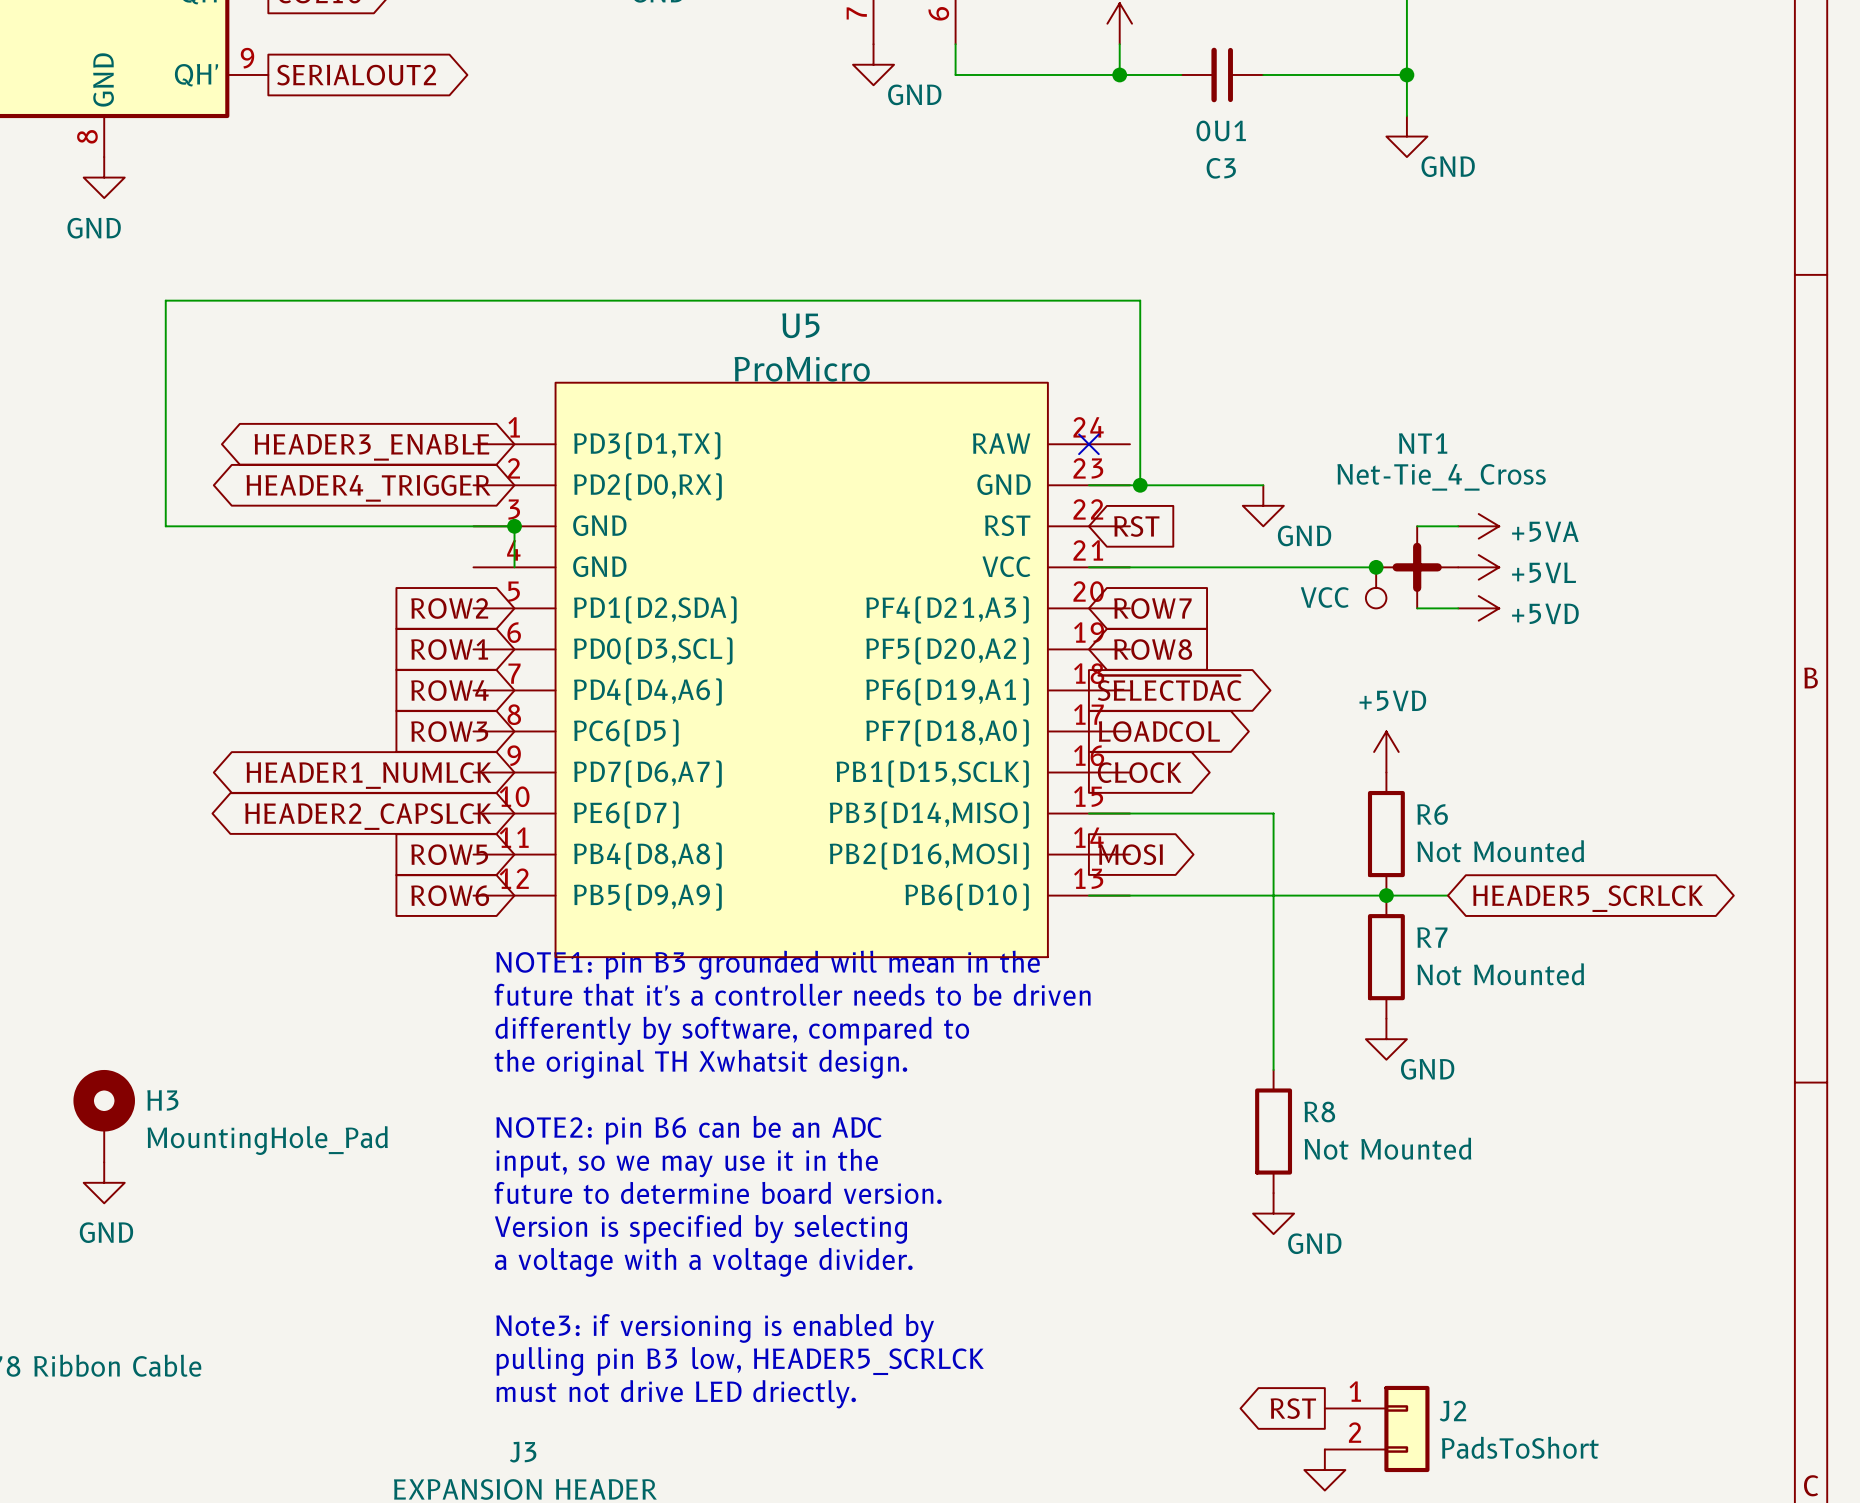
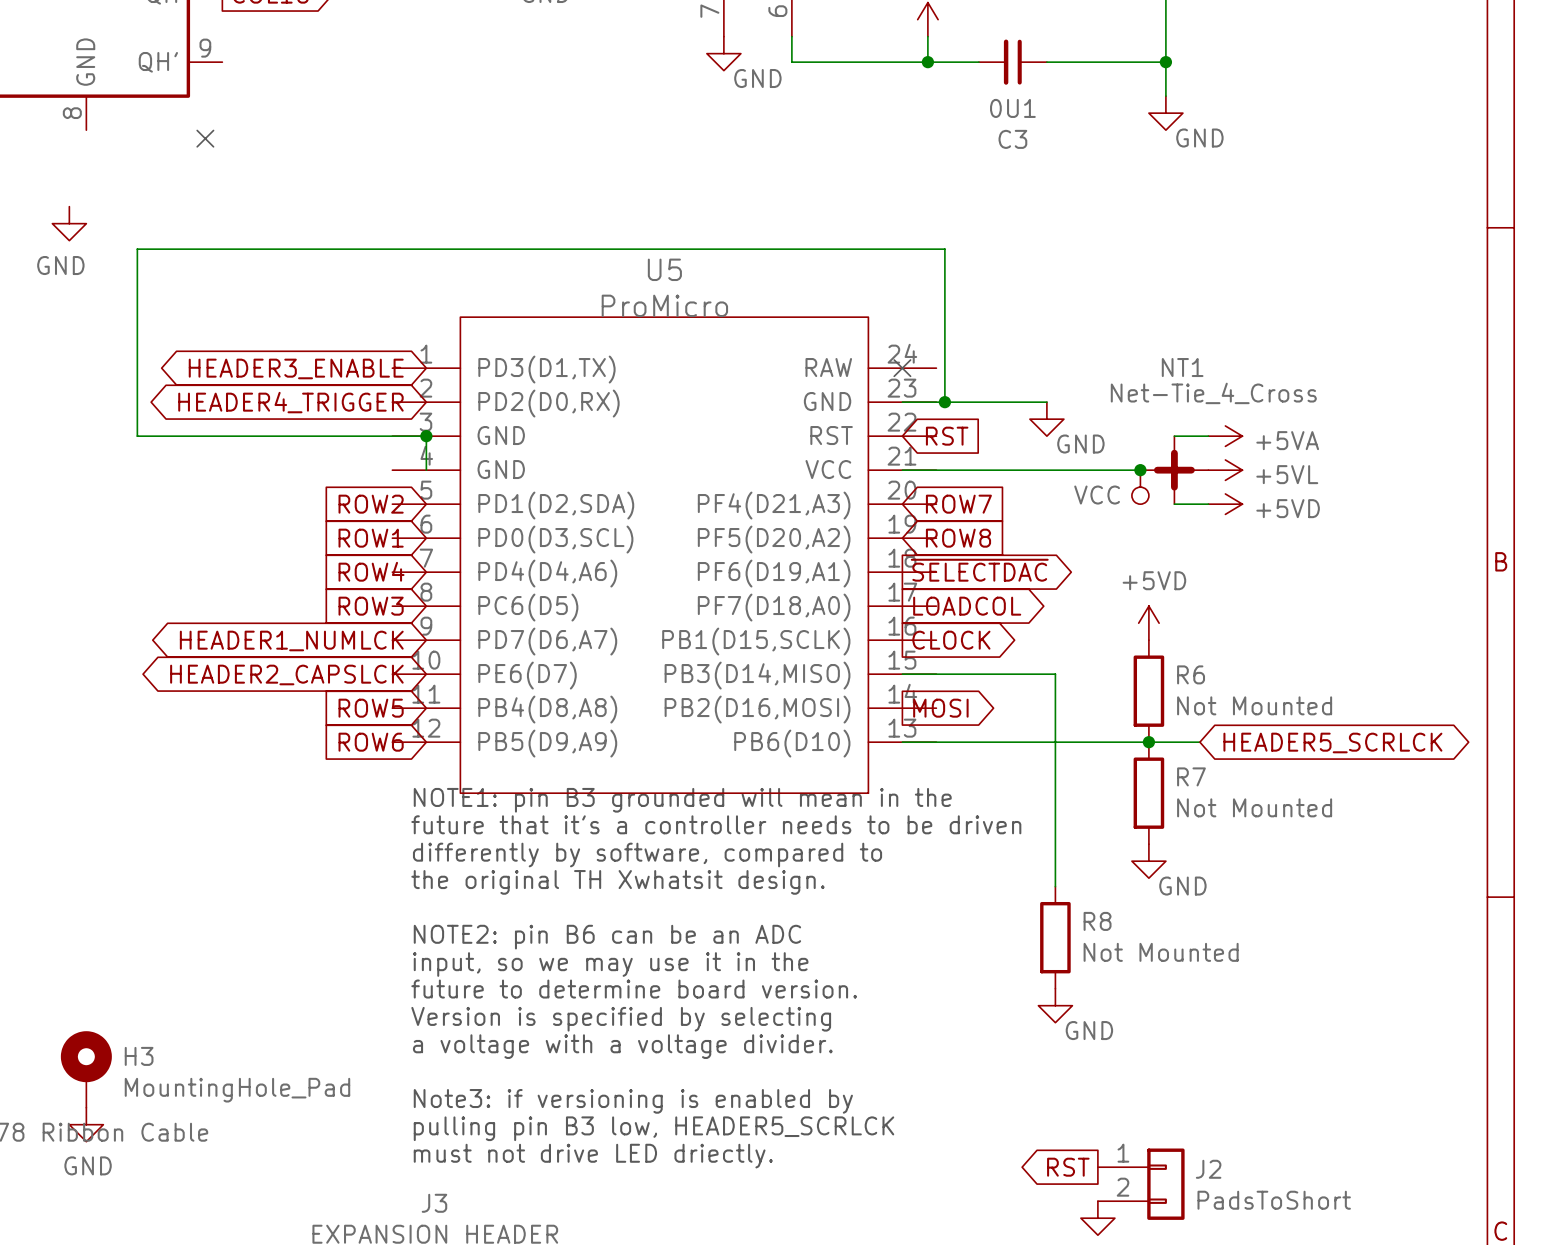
global label: SERIALOUT2 (356, 75) -> none
no-connect mark: none -> (205, 138)
power symbol position: GND (104, 177) -> GND (69, 223)
H3 position: (104, 1116) -> (86, 1069)
power symbol: GND (104, 1182) -> none
power symbol: none -> GND (86, 1124)

